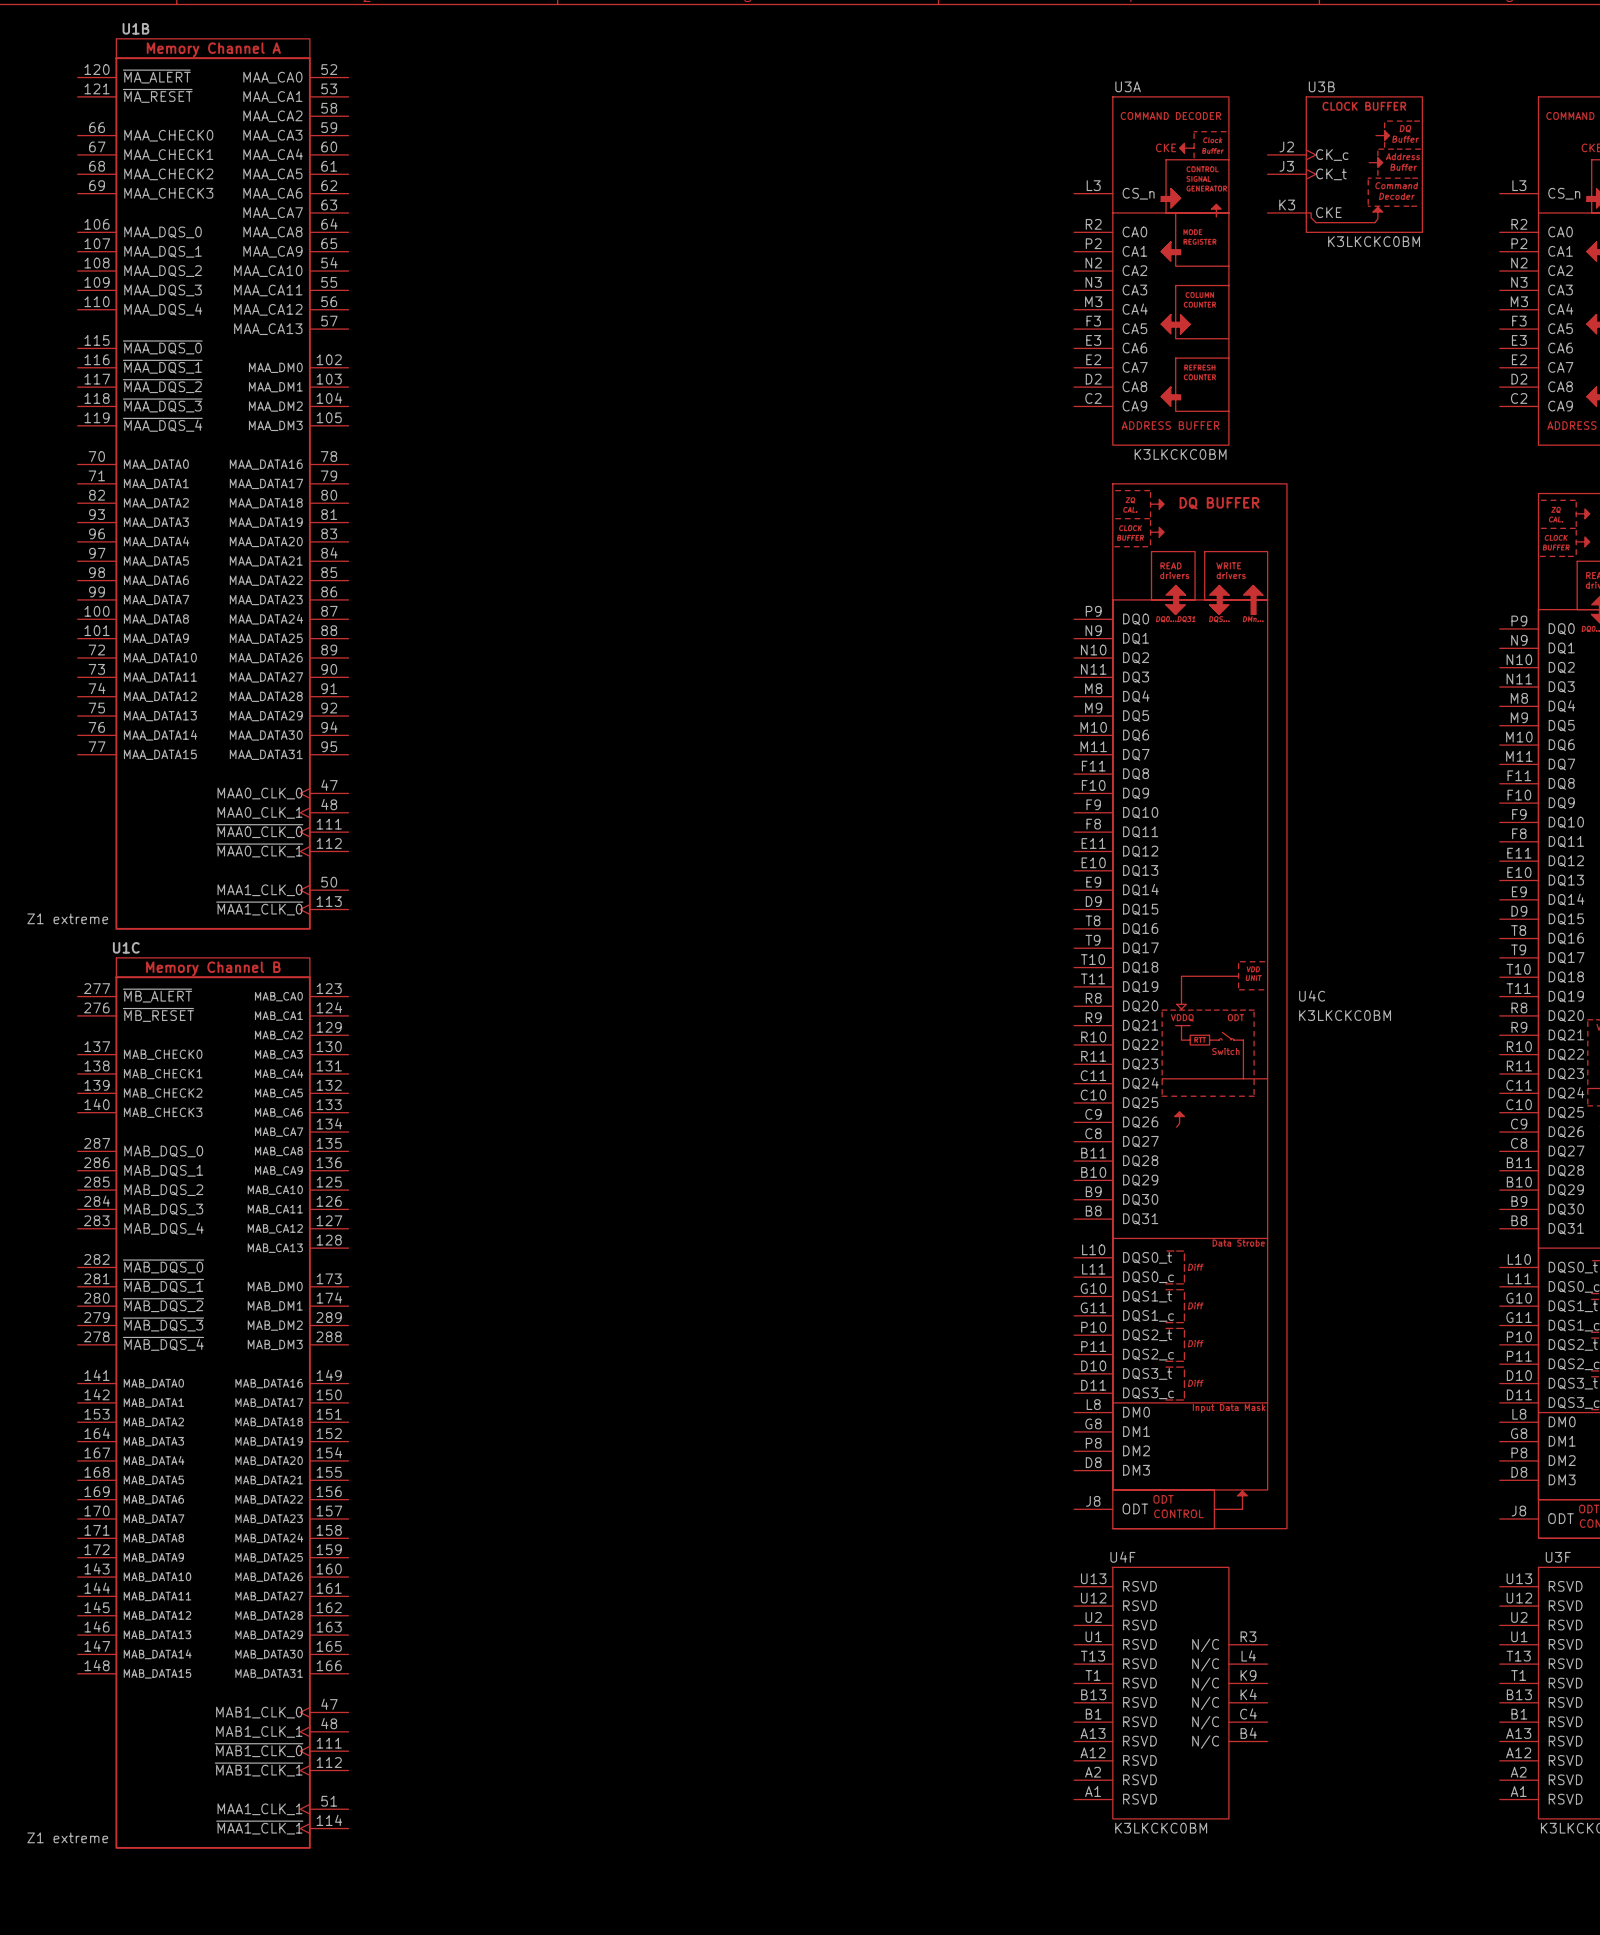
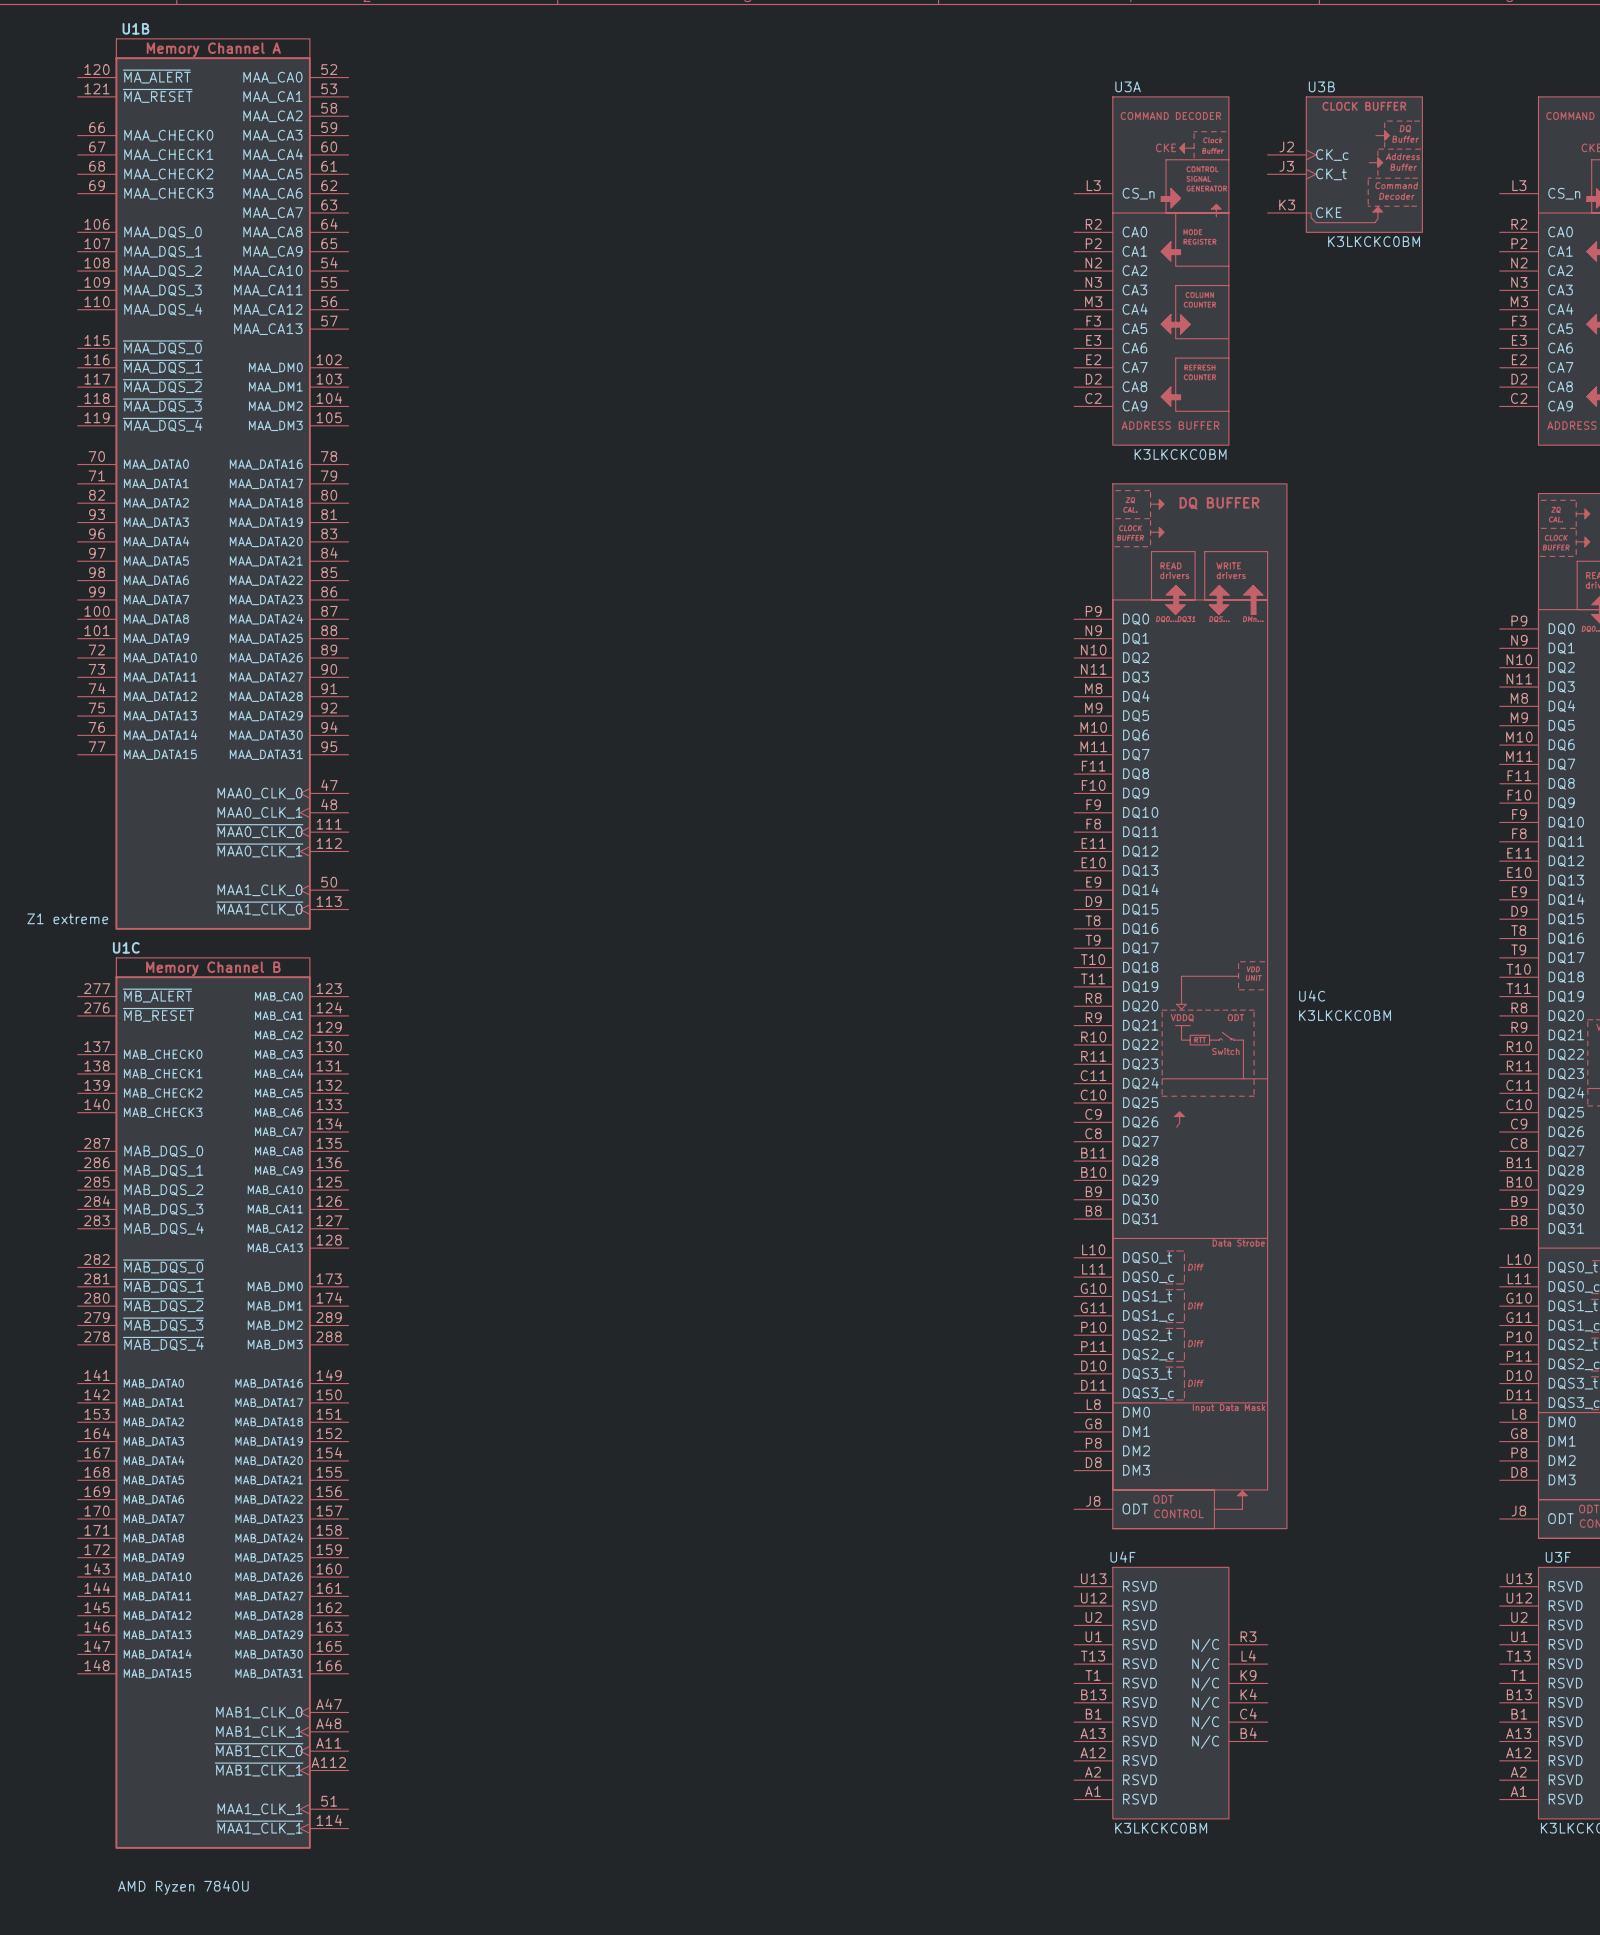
U1C pin number: 47 (329, 1704) -> A47 (328, 1704)
U1C pin number: 48 (329, 1723) -> A48 (328, 1723)
U1C pin number: 111 (329, 1743) -> A11 (328, 1743)
U1C pin number: 112 (329, 1762) -> A112 (328, 1762)
U1C value: Z1 extreme (67, 1837) -> AMD Ryzen 7840U (183, 1887)

